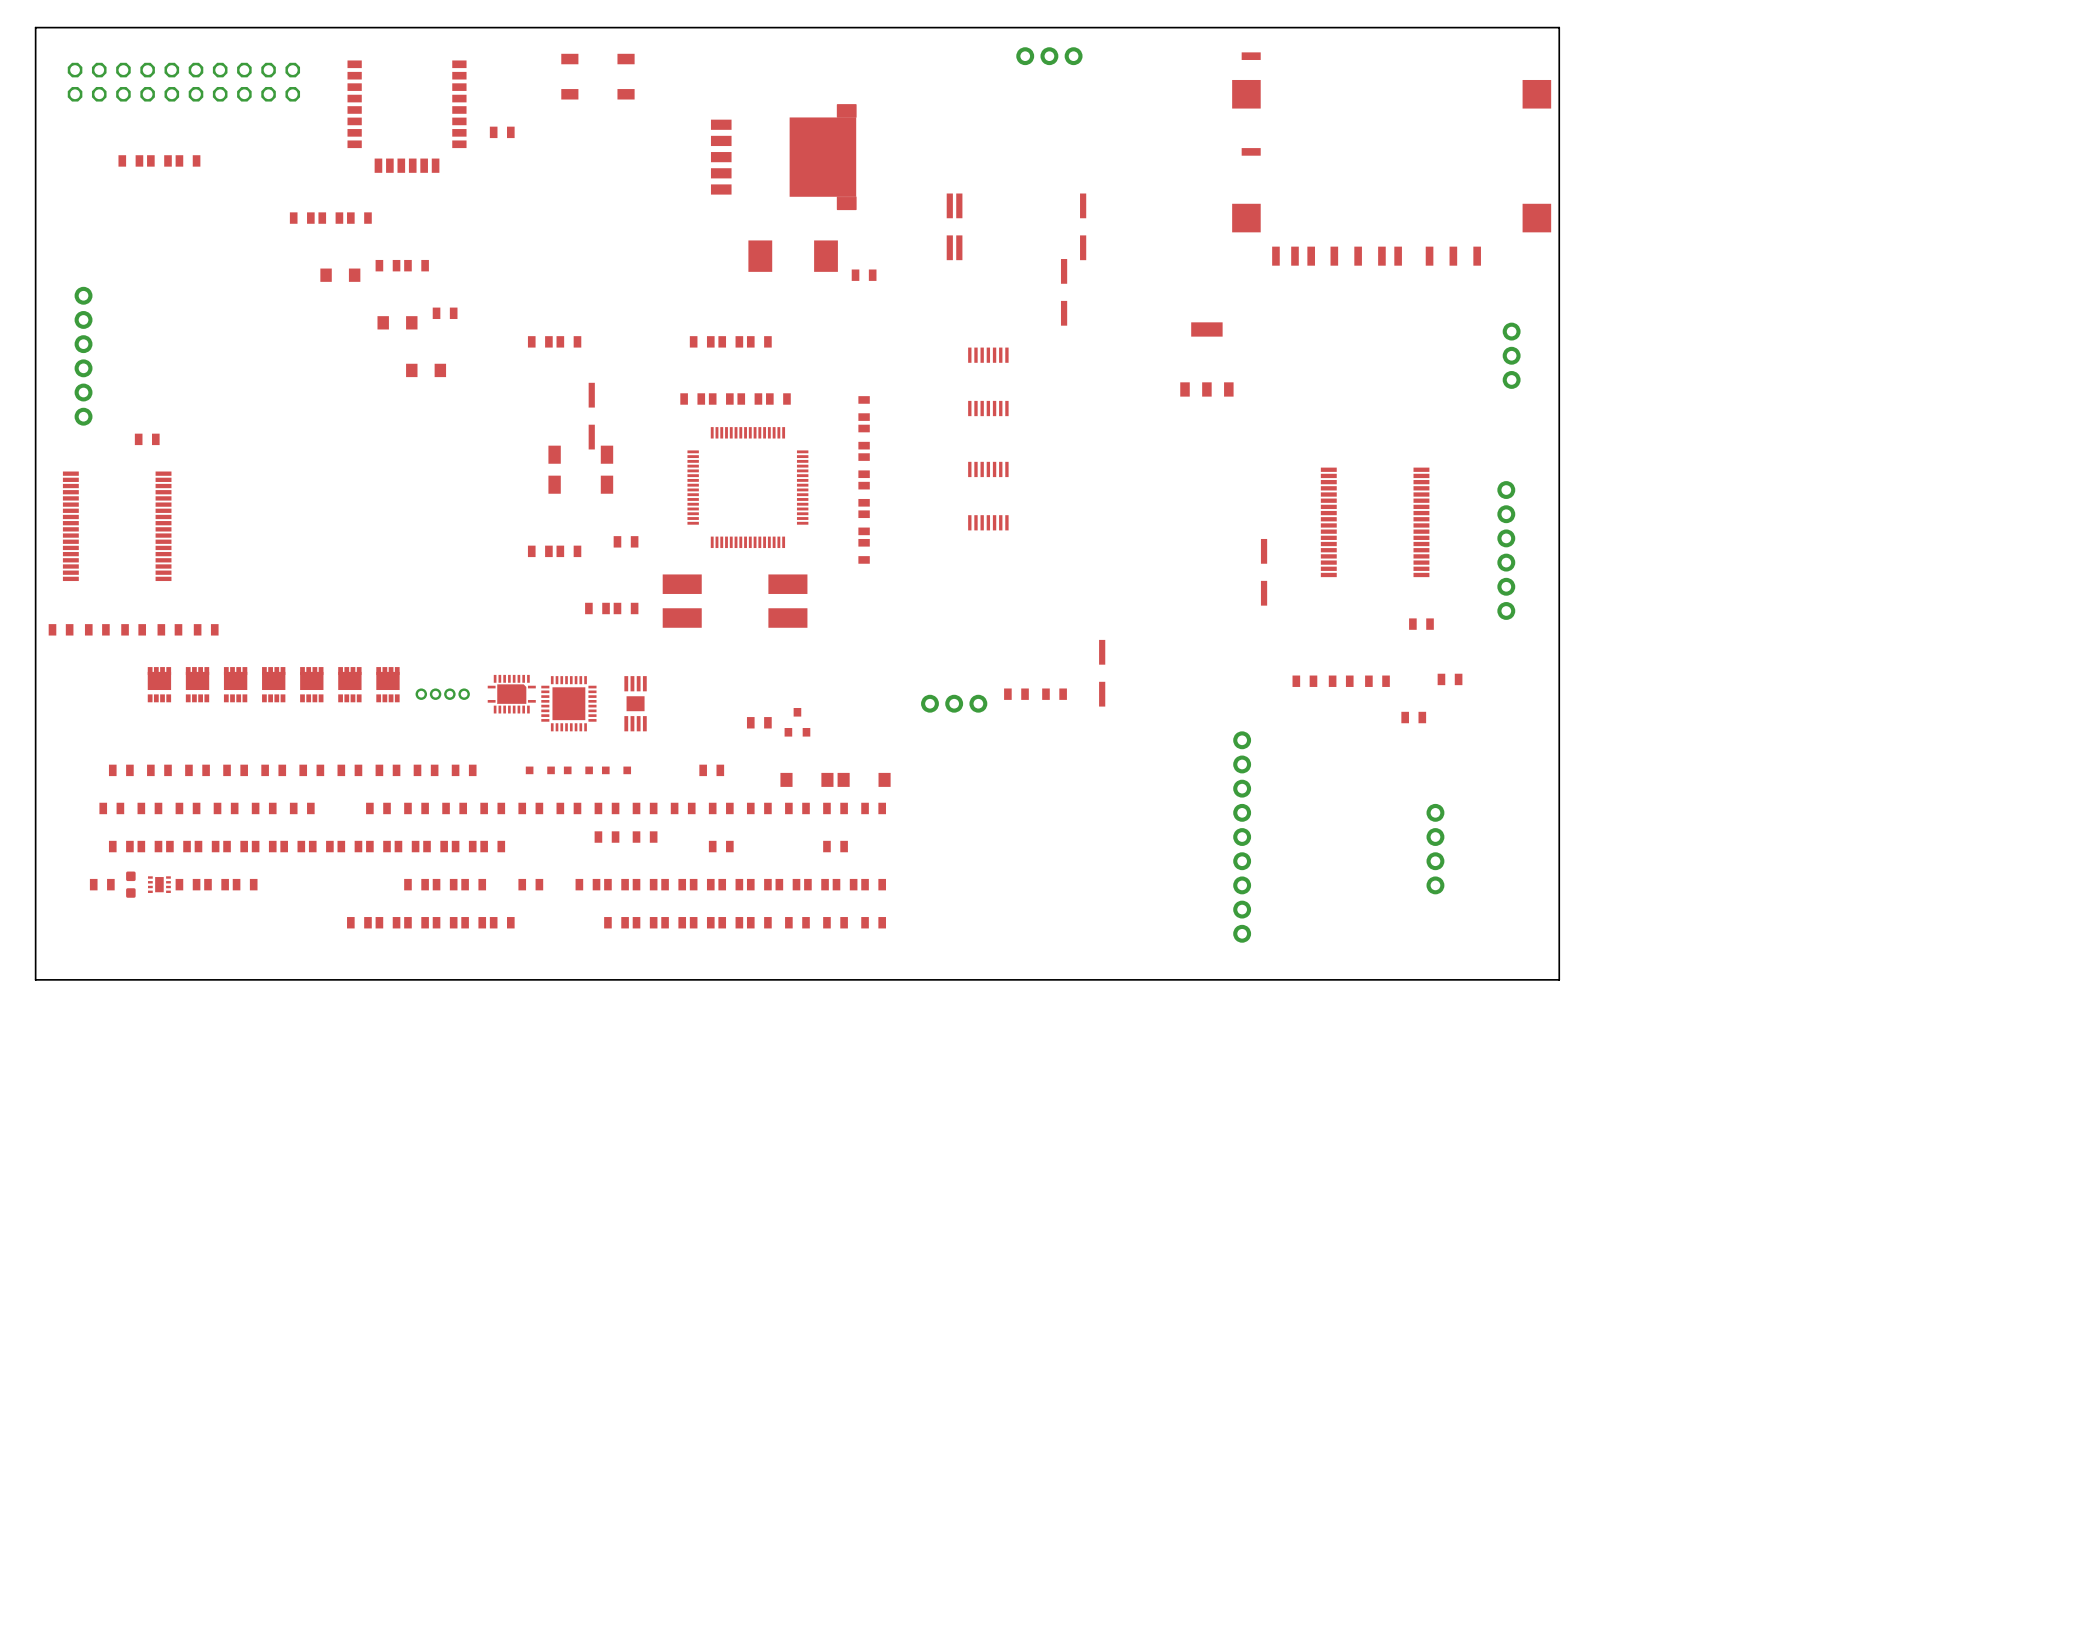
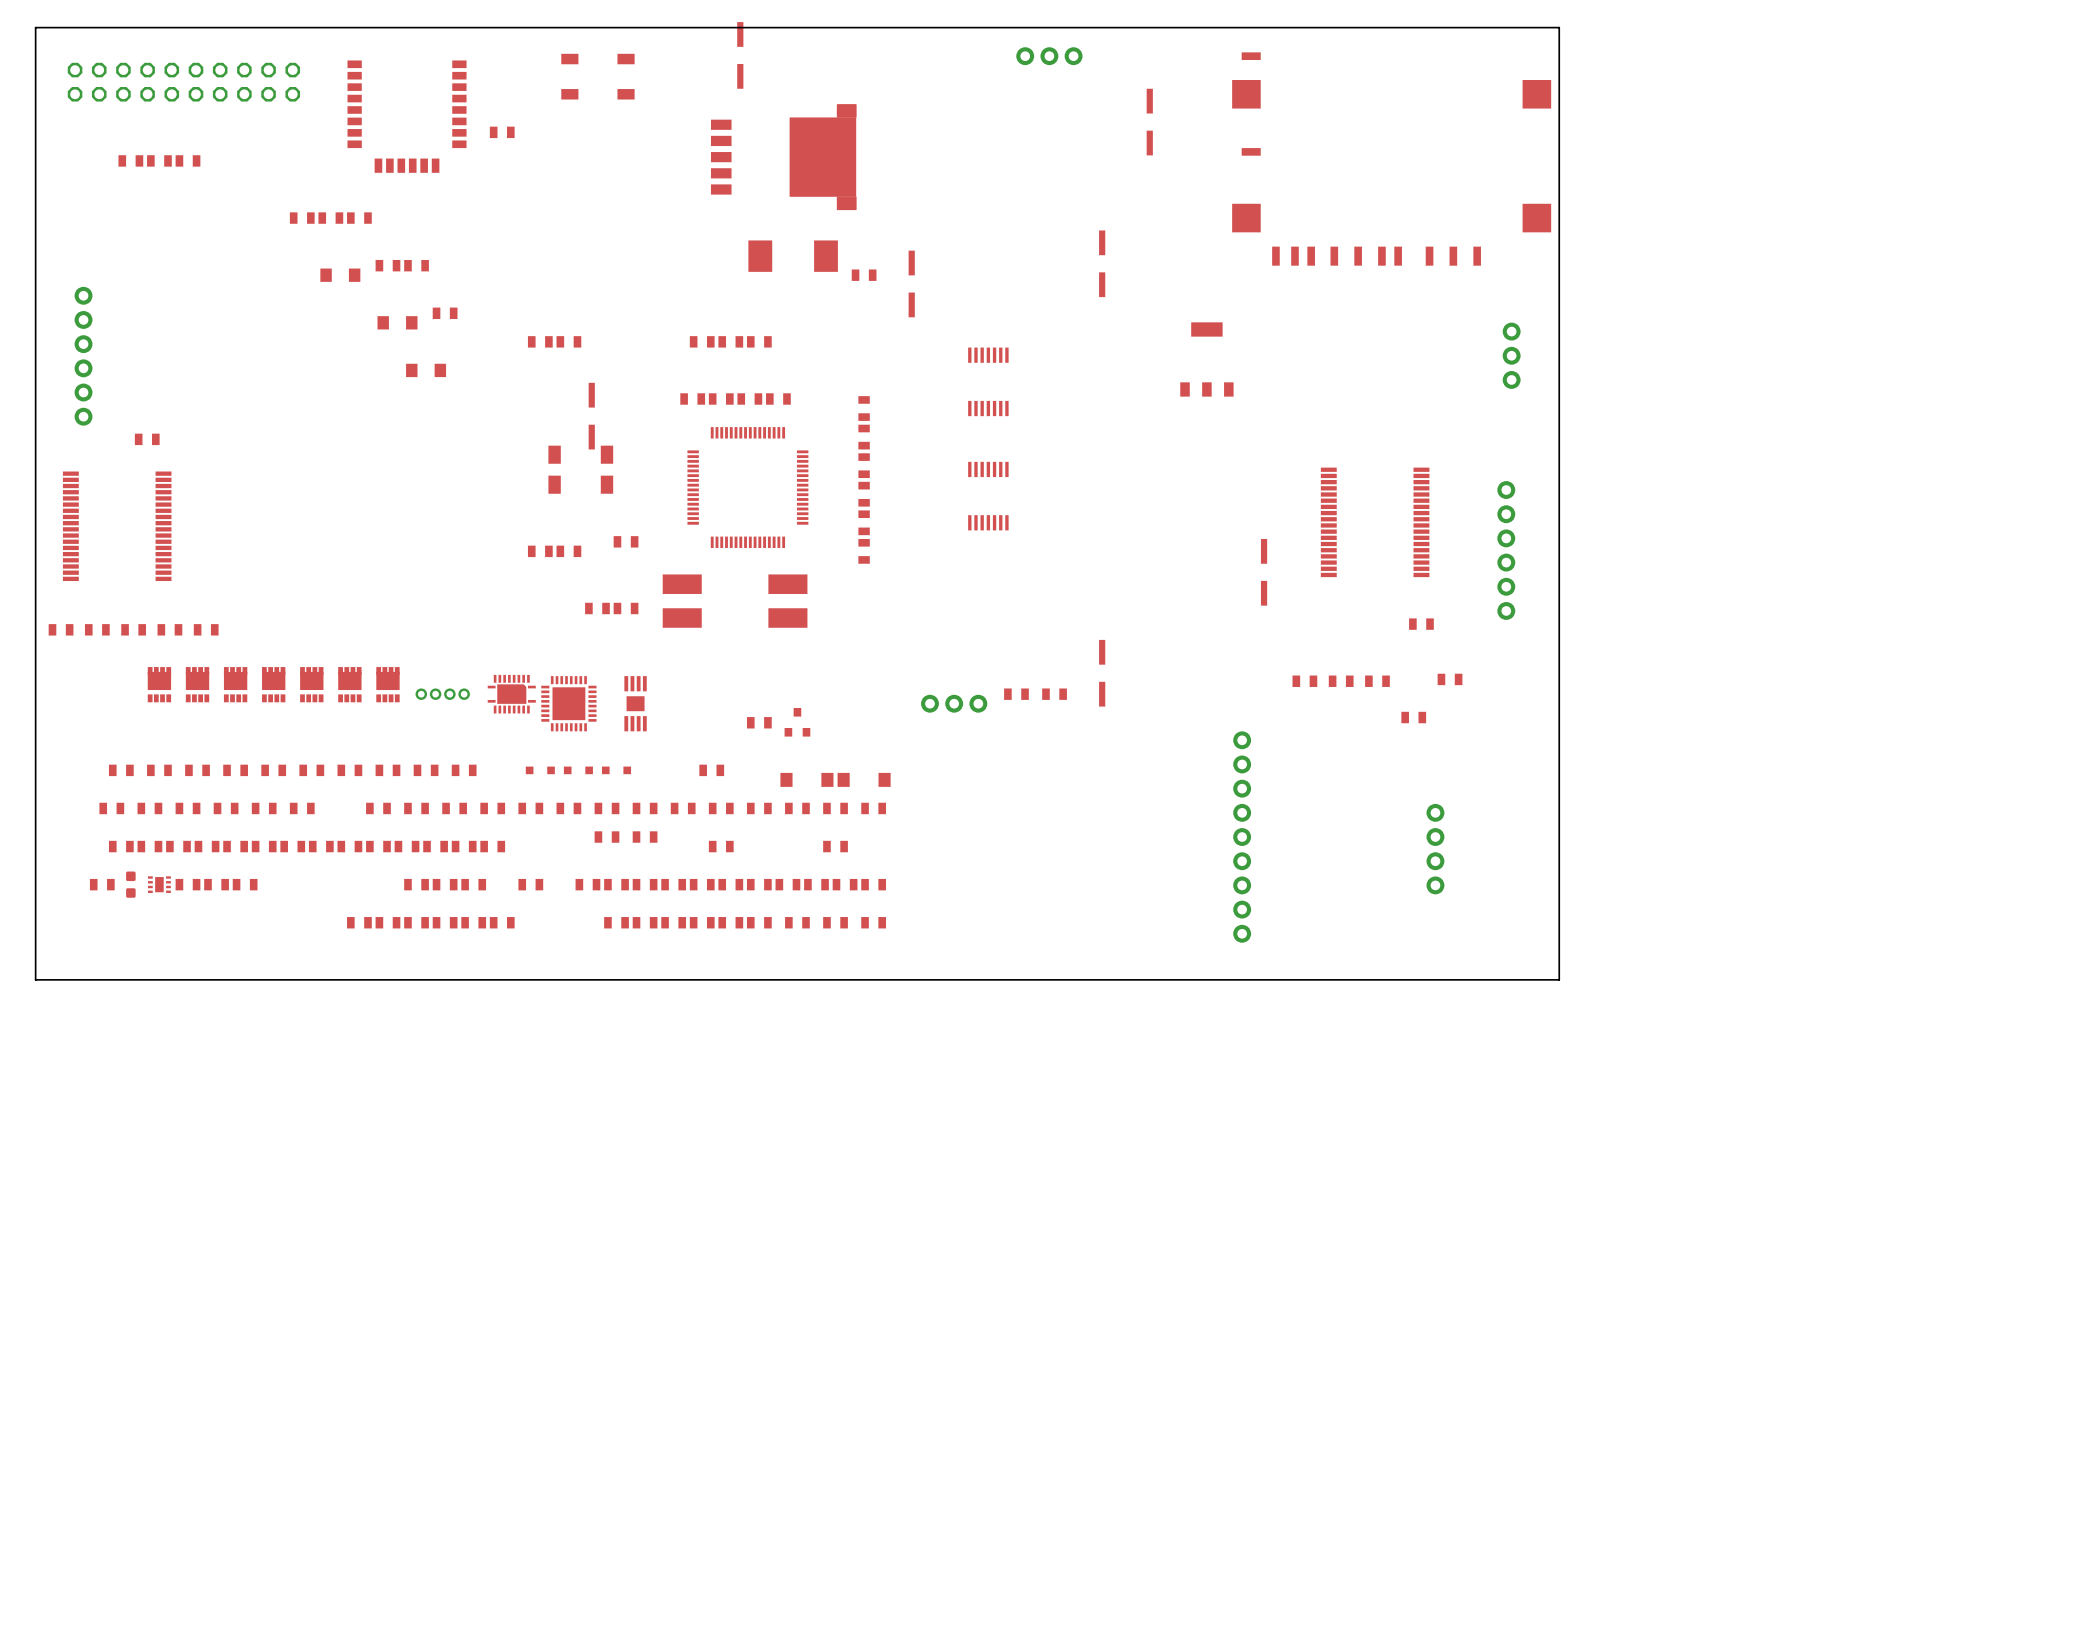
part: none -> (740, 55)
part: none -> (1149, 122)
part: (949, 226) -> none
part: (959, 226) -> none
part: (1083, 226) -> none
part: none -> (1102, 263)
part: none -> (911, 283)
part: (1064, 292) -> none

